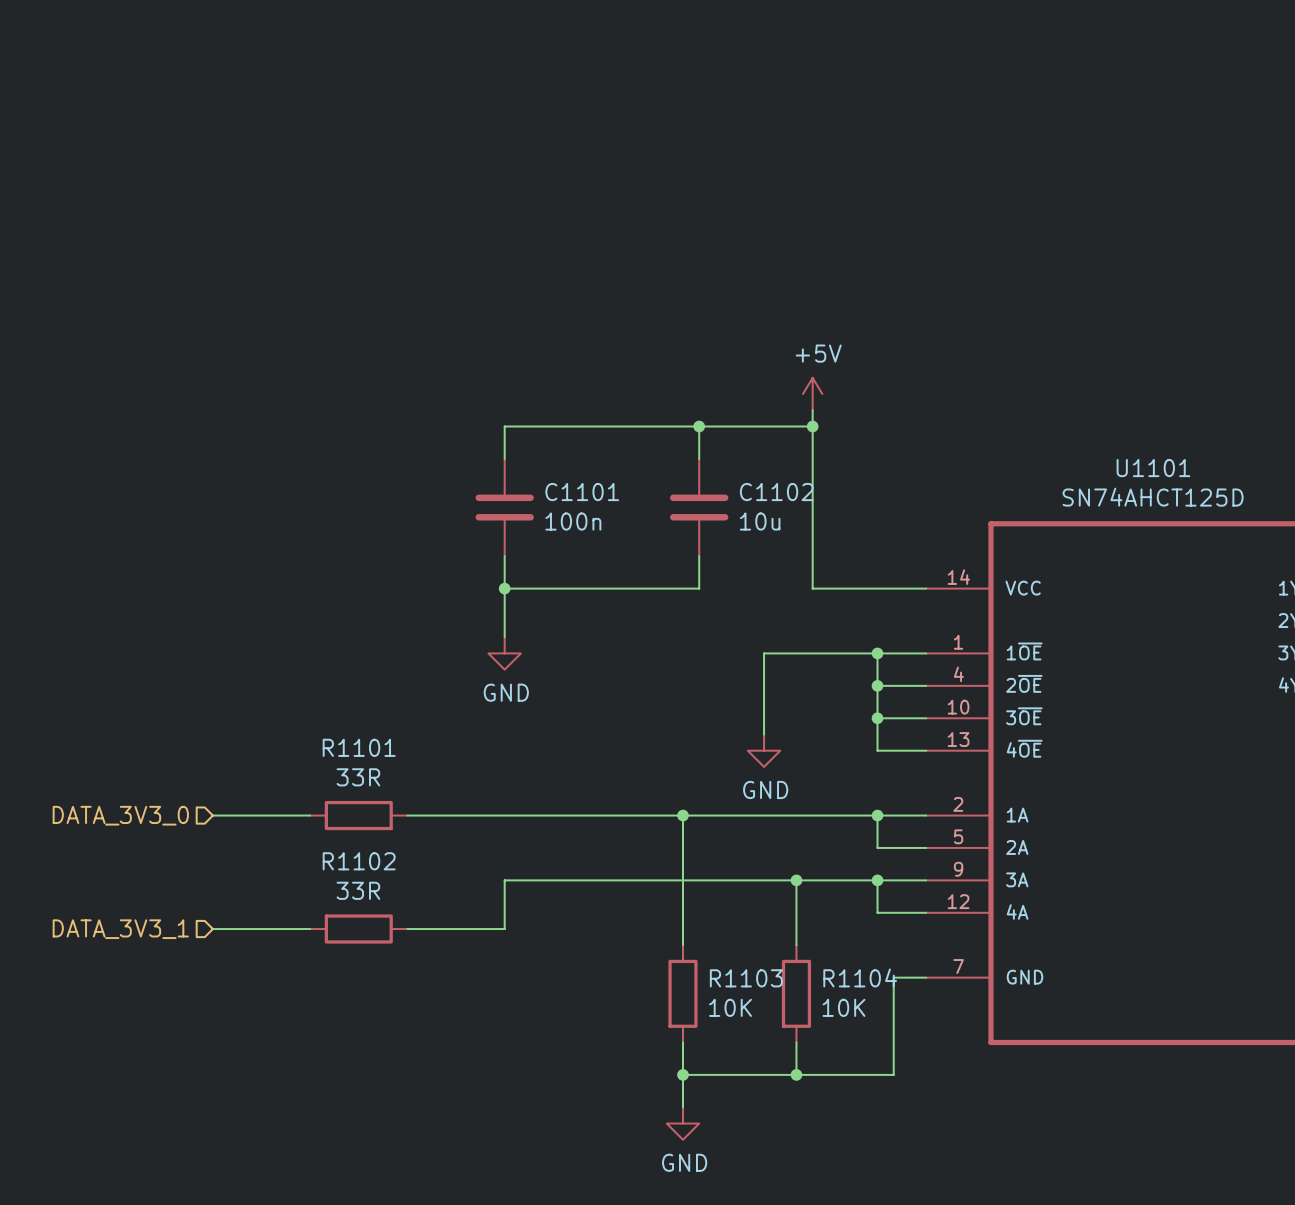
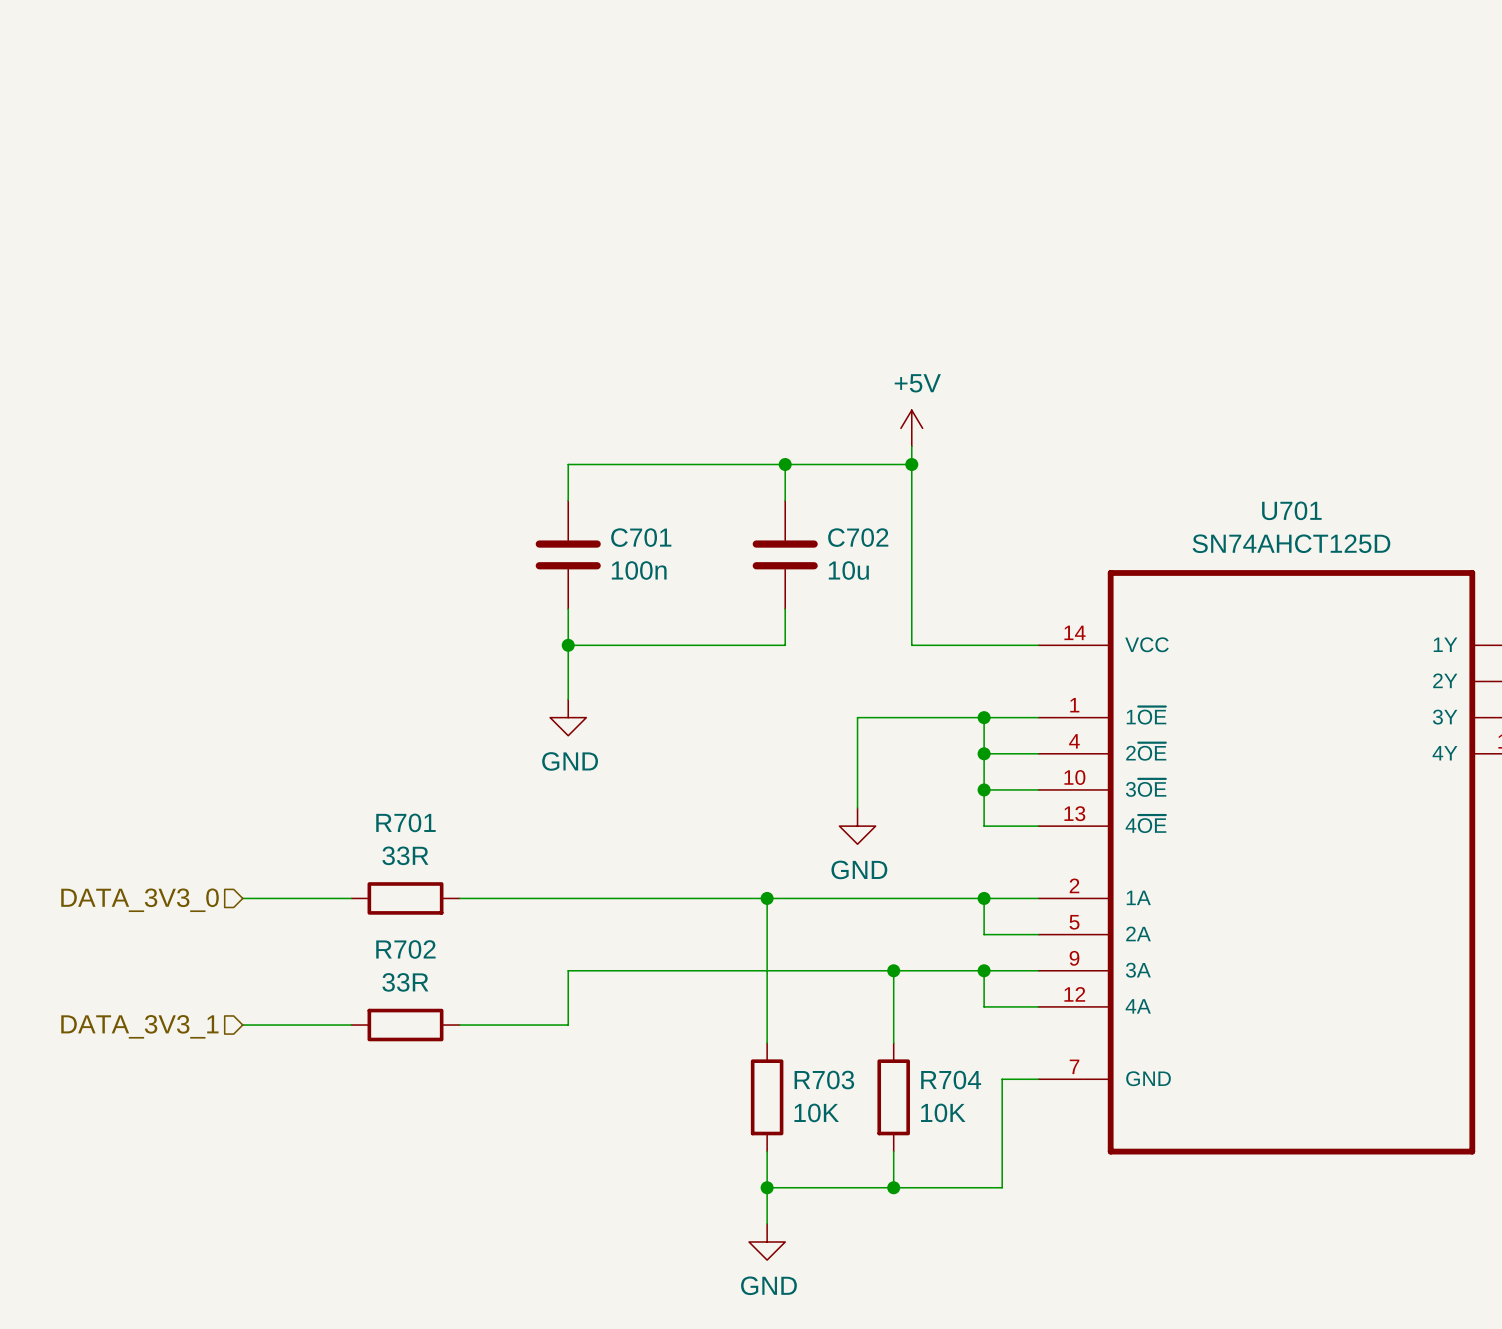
U1101 name: U1101 (1153, 468) -> U701 (1291, 510)
C1101 name: C1101 (582, 492) -> C701 (641, 537)
C1102 name: C1102 (776, 492) -> C702 (858, 537)
R1101 name: R1101 (359, 747) -> R701 (405, 822)
R1102 name: R1102 (359, 861) -> R702 (405, 949)
R1104 name: R1104 (860, 977) -> R704 (951, 1080)
R1103 name: R1103 (746, 978) -> R703 (824, 1080)

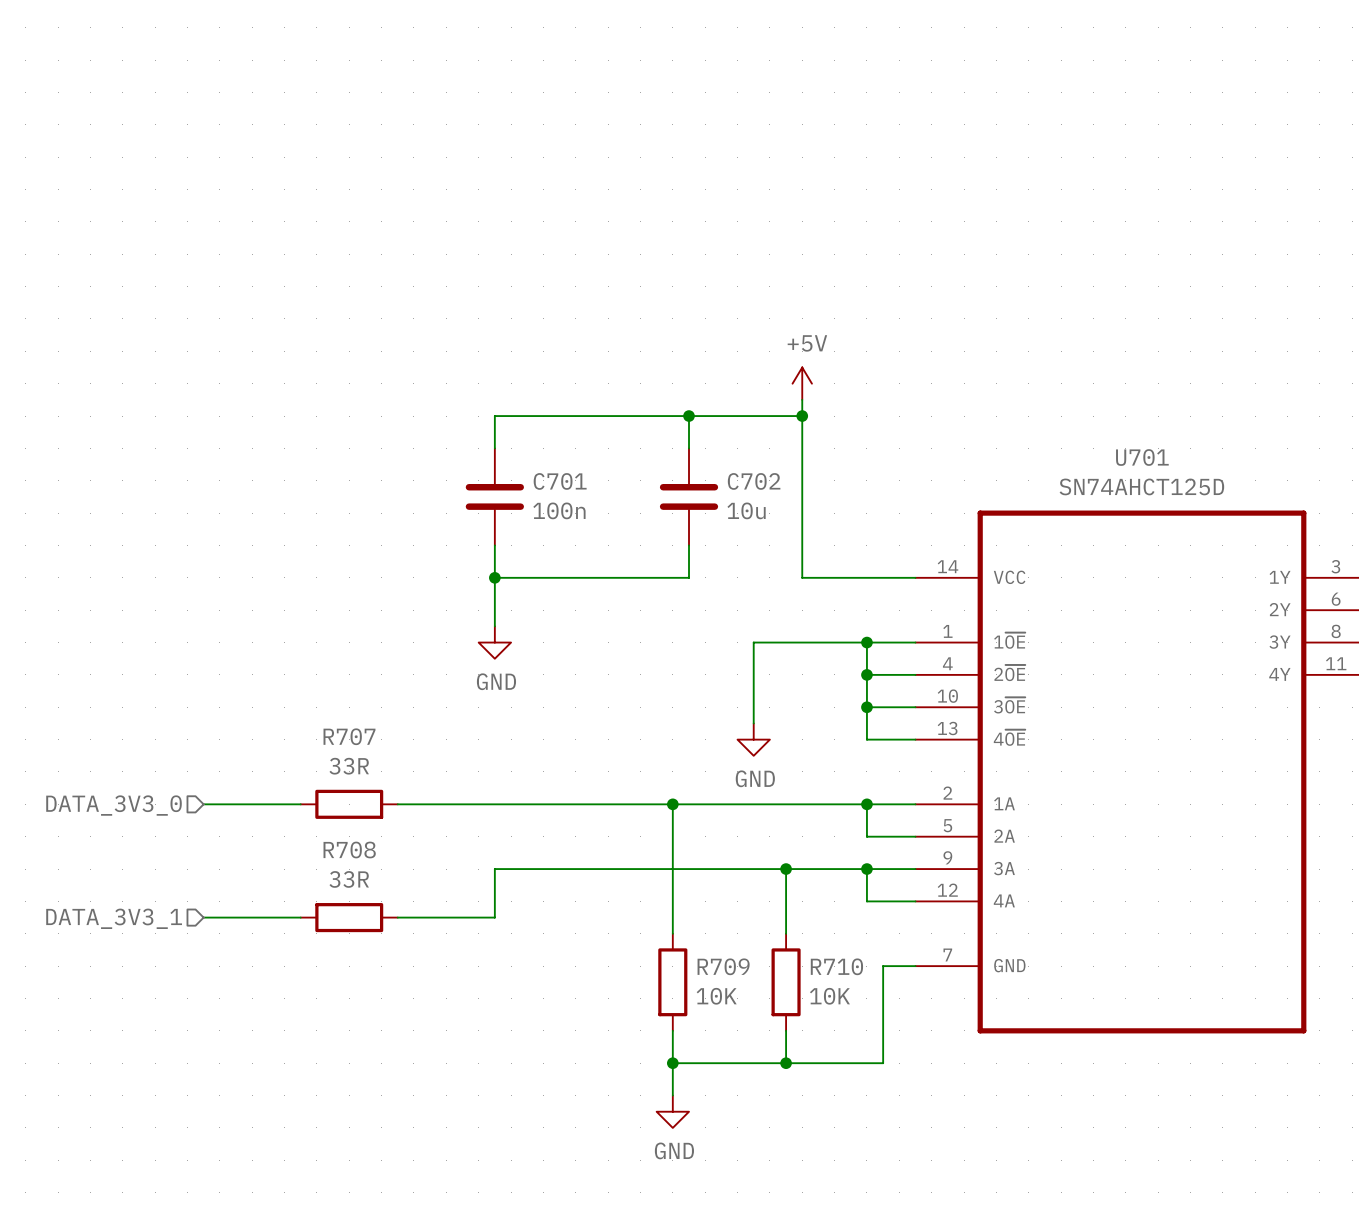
R701 name: R701 (405, 822) -> R707 (349, 736)
R702 name: R702 (405, 949) -> R708 (349, 850)
R703 name: R703 (824, 1080) -> R709 (723, 966)
R704 name: R704 (951, 1080) -> R710 (836, 966)

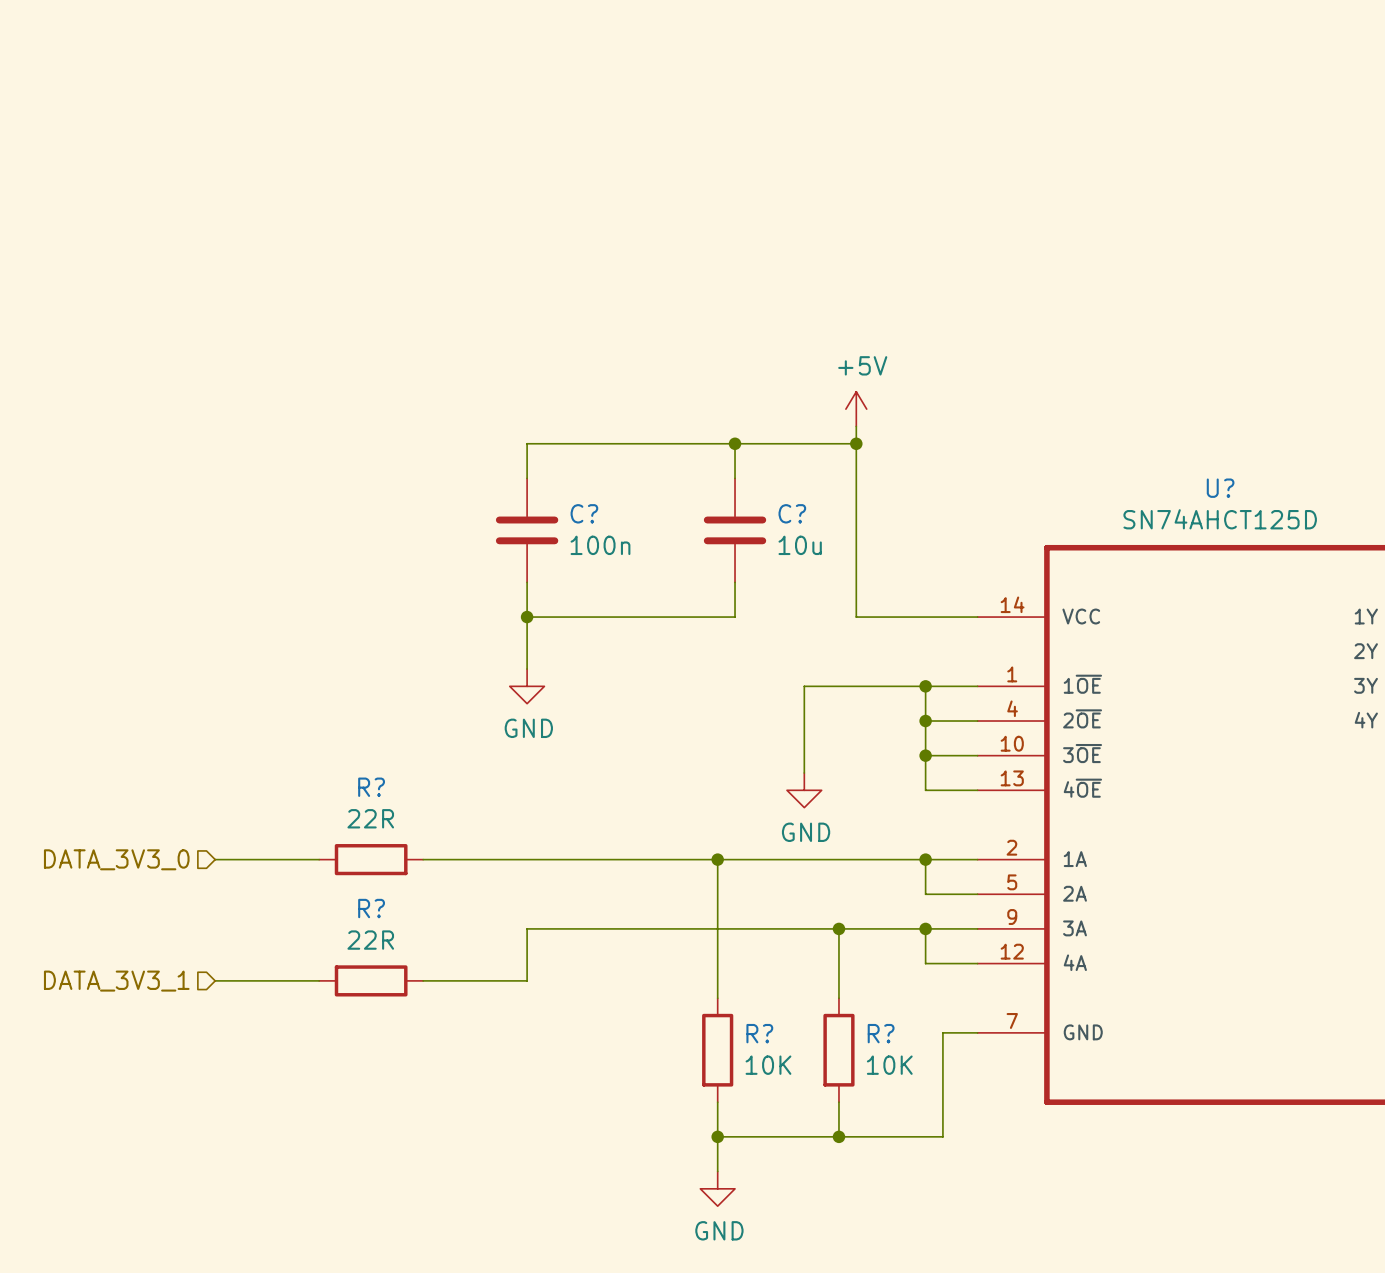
U701 name: U701 (1142, 457) -> U? (1220, 488)
C701 name: C701 (560, 481) -> C? (584, 513)
C702 name: C702 (754, 481) -> C? (792, 513)
R707 name: R707 (349, 736) -> R? (371, 787)
R707 value: 33R (349, 766) -> 22R (370, 818)
R708 name: R708 (349, 850) -> R? (371, 908)
R708 value: 33R (349, 879) -> 22R (370, 940)
R709 name: R709 (723, 966) -> R? (759, 1033)
R710 name: R710 (836, 966) -> R? (881, 1033)

